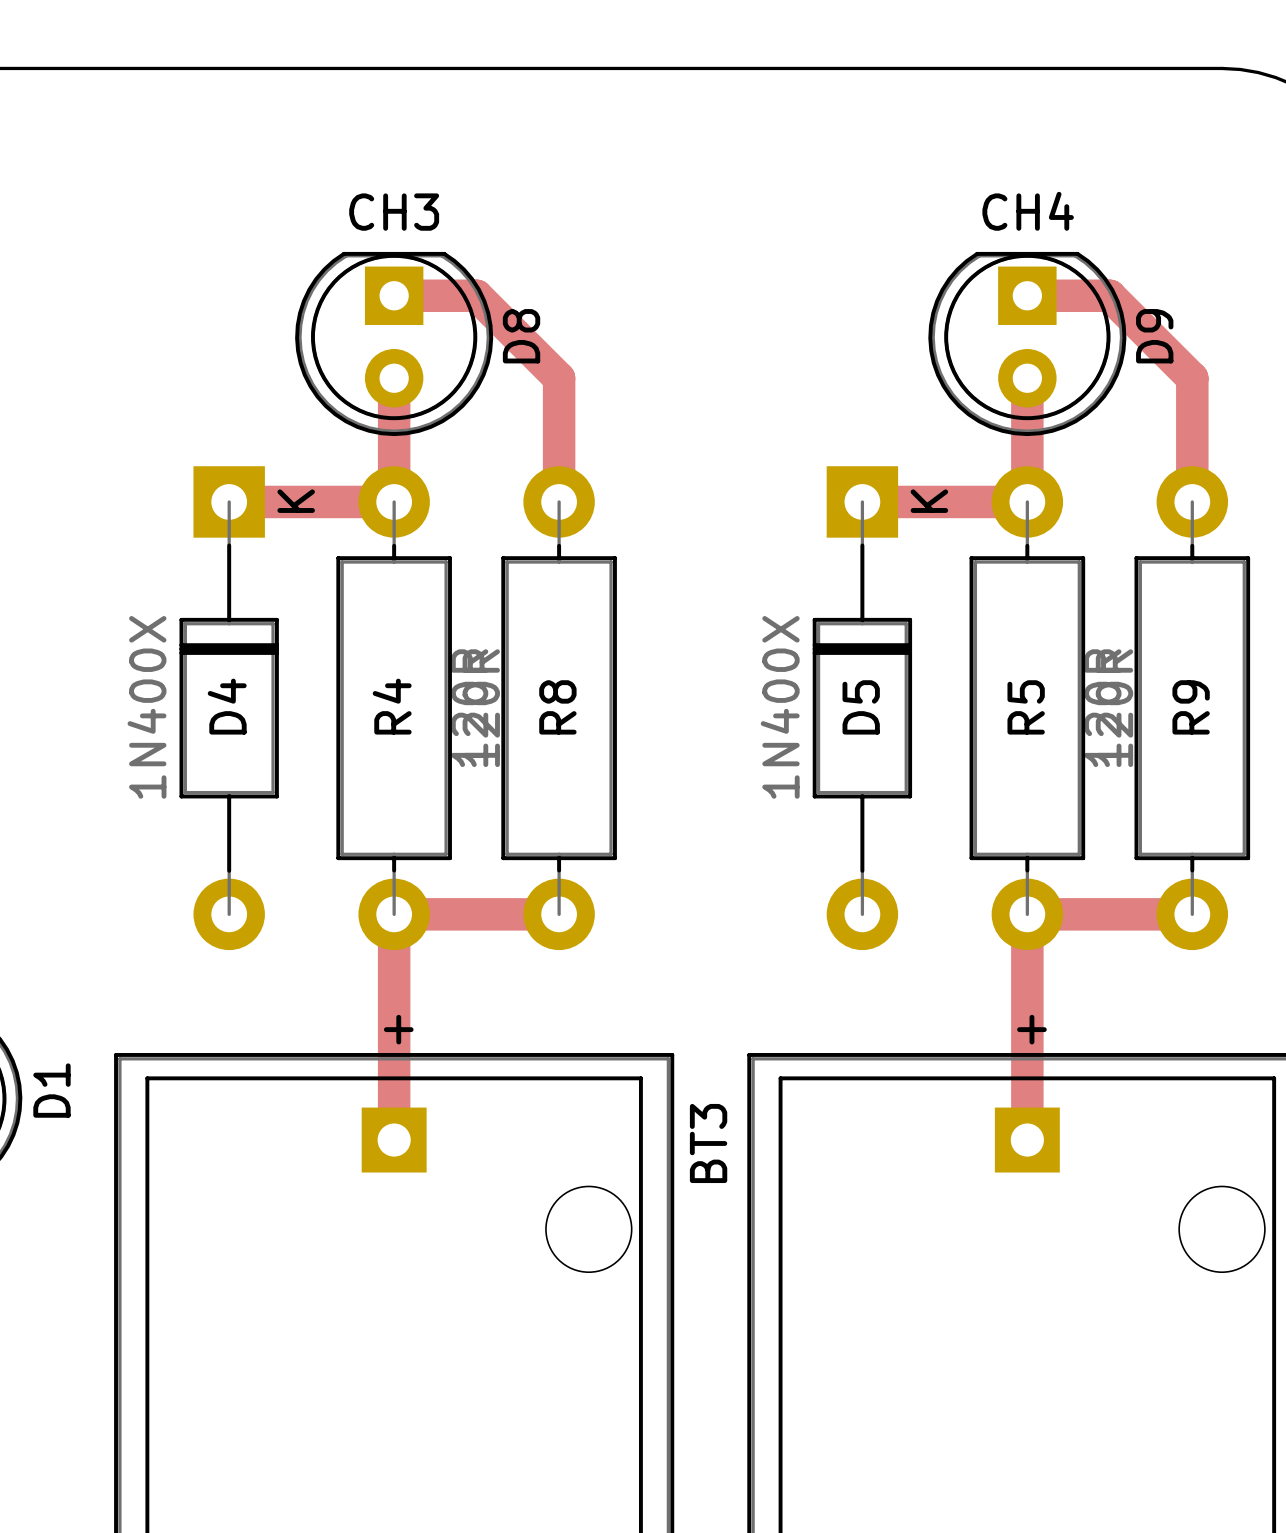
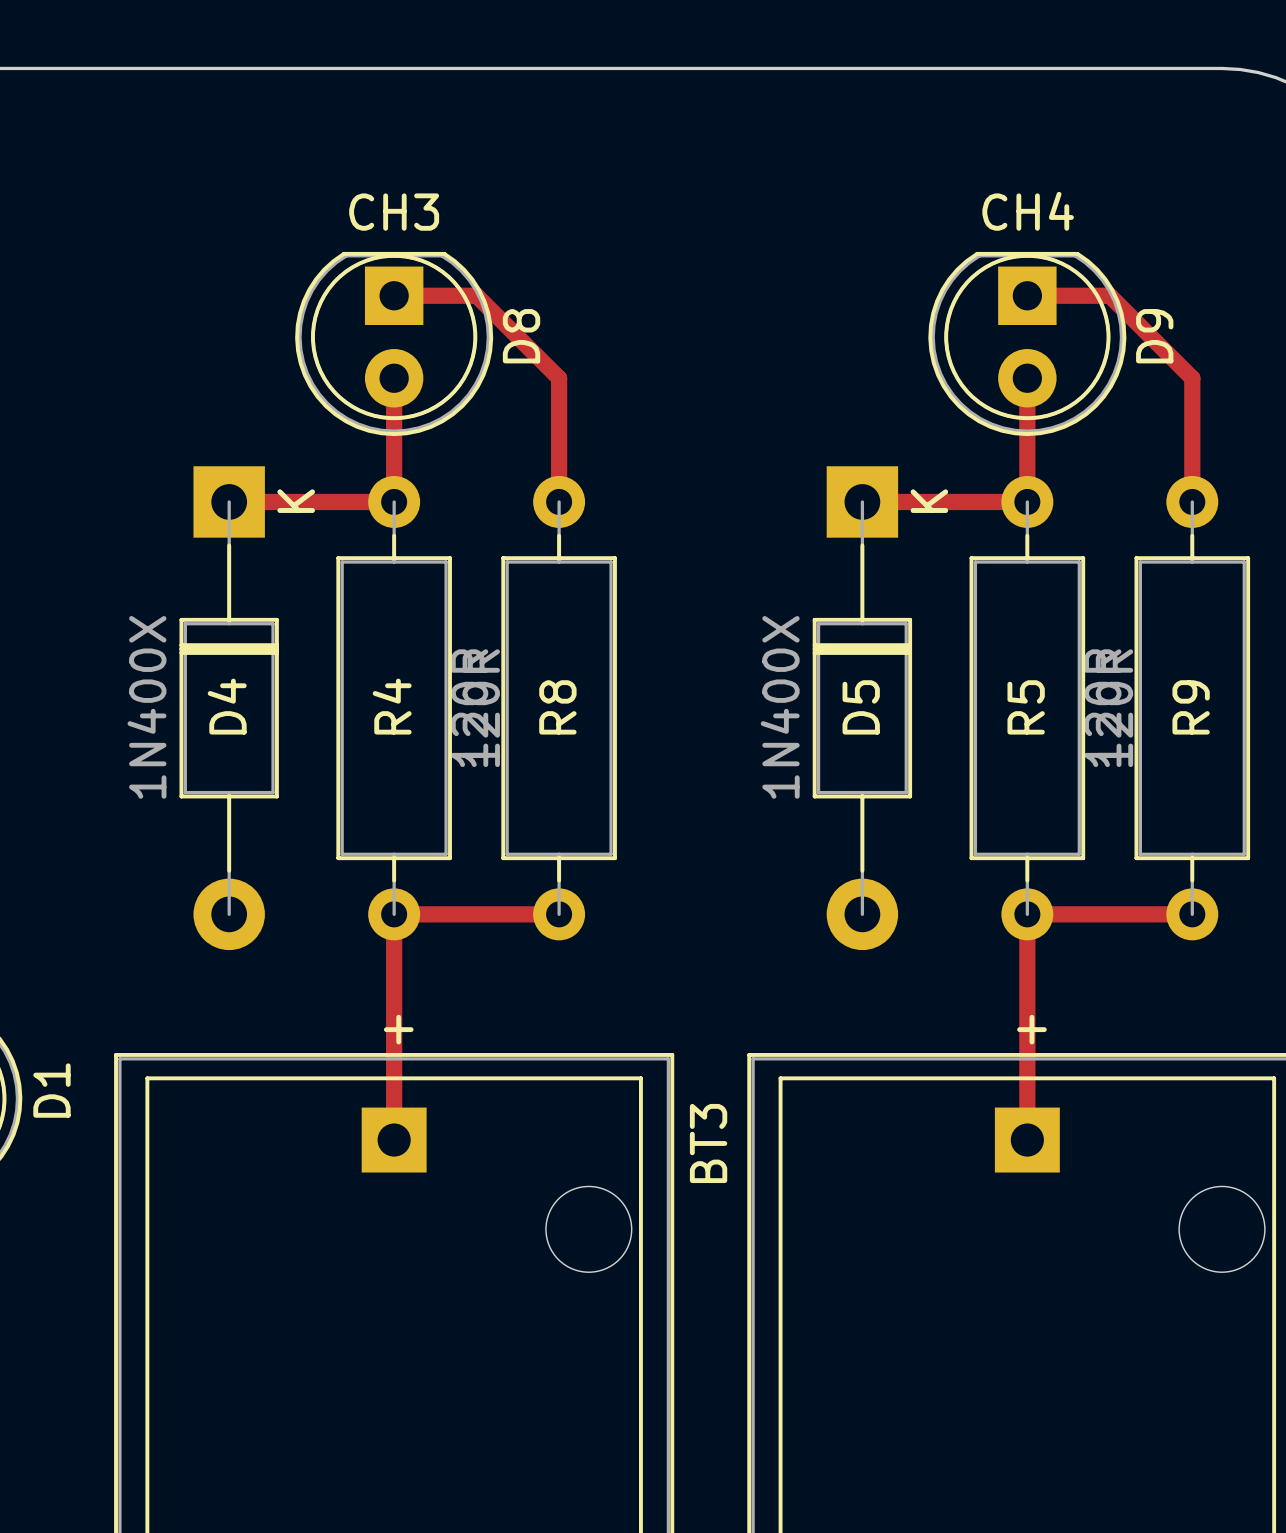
top track width: thick (394, 295) (476, 295) (559, 378) (559, 501) -> thin (394, 295) (476, 295) (559, 378) (559, 501)
top track width: thick (1027, 295) (1109, 295) (1192, 378) (1192, 501) -> thin (1027, 295) (1109, 295) (1192, 378) (1192, 501)
top track width: thick (394, 378) (394, 501) (229, 501) -> thin (394, 378) (394, 501) (229, 501)
top track width: thick (1027, 378) (1027, 501) (862, 501) -> thin (1027, 378) (1027, 501) (862, 501)
R4 footprint: [336, 466, 452, 951] -> [336, 475, 452, 941]
R8 footprint: [501, 466, 617, 951] -> [501, 475, 617, 941]
R5 footprint: [969, 466, 1086, 951] -> [969, 475, 1086, 941]
R9 footprint: [1134, 466, 1251, 951] -> [1134, 475, 1251, 941]
top track width: thick (559, 914) (394, 914) (394, 1140) -> thin (559, 914) (394, 914) (394, 1140)
top track width: thick (1192, 914) (1027, 914) (1027, 1140) -> thin (1192, 914) (1027, 914) (1027, 1140)

